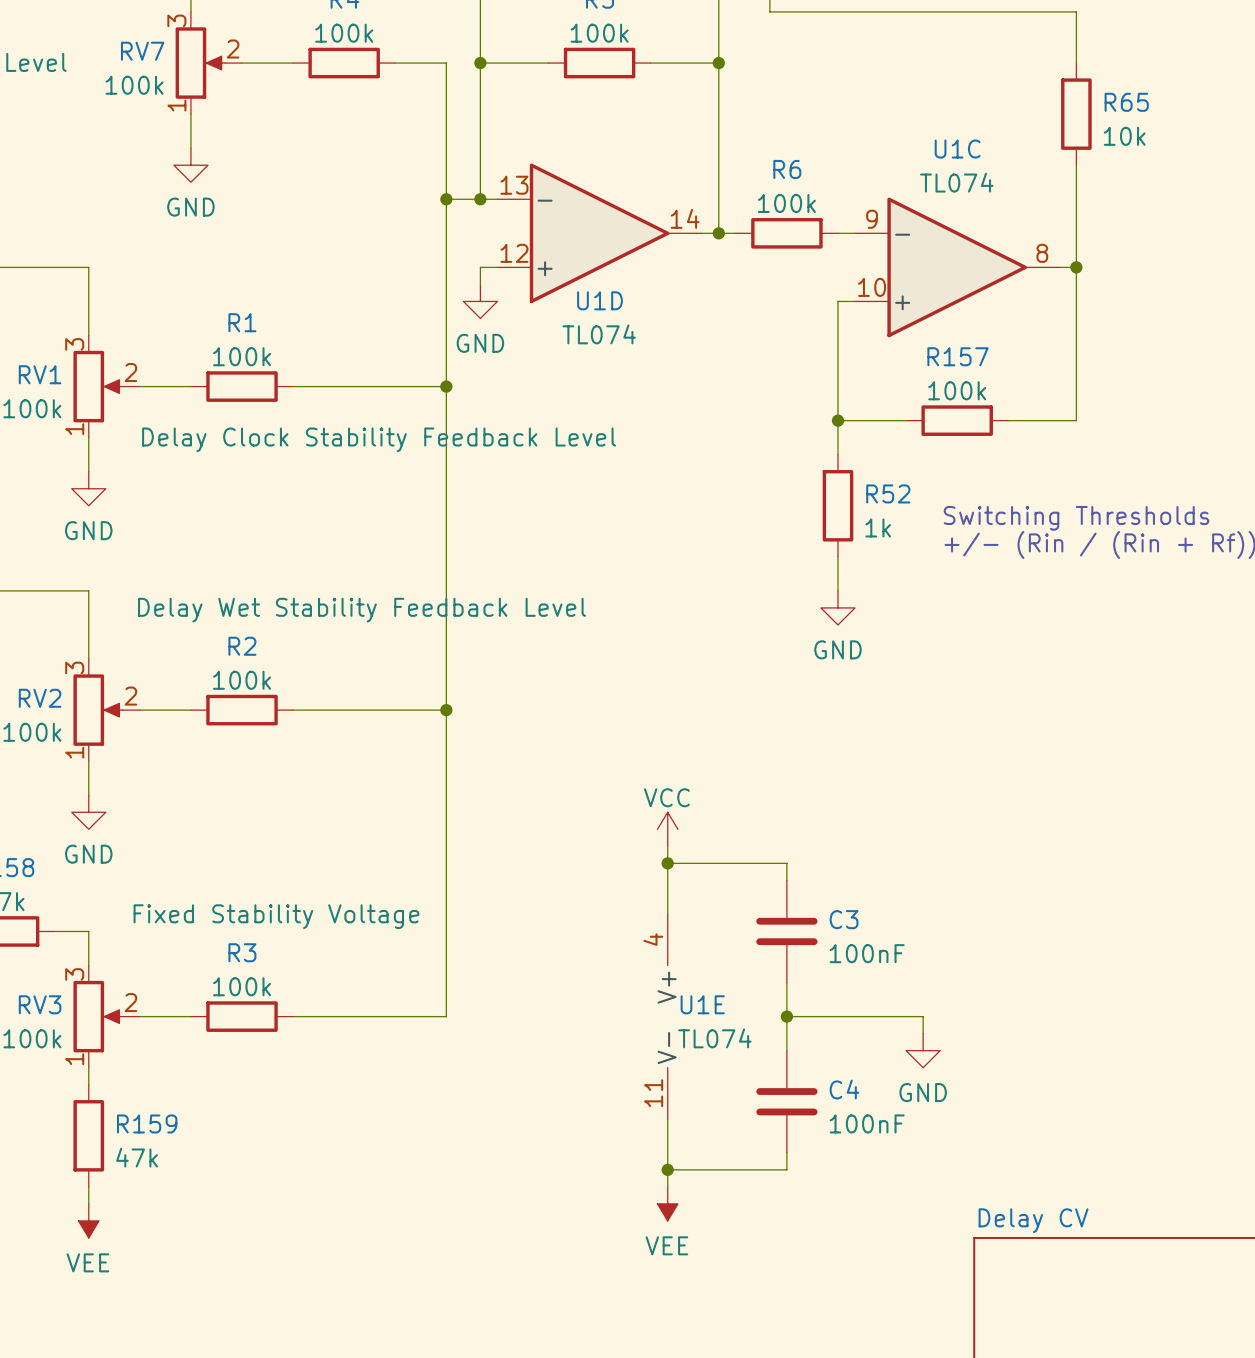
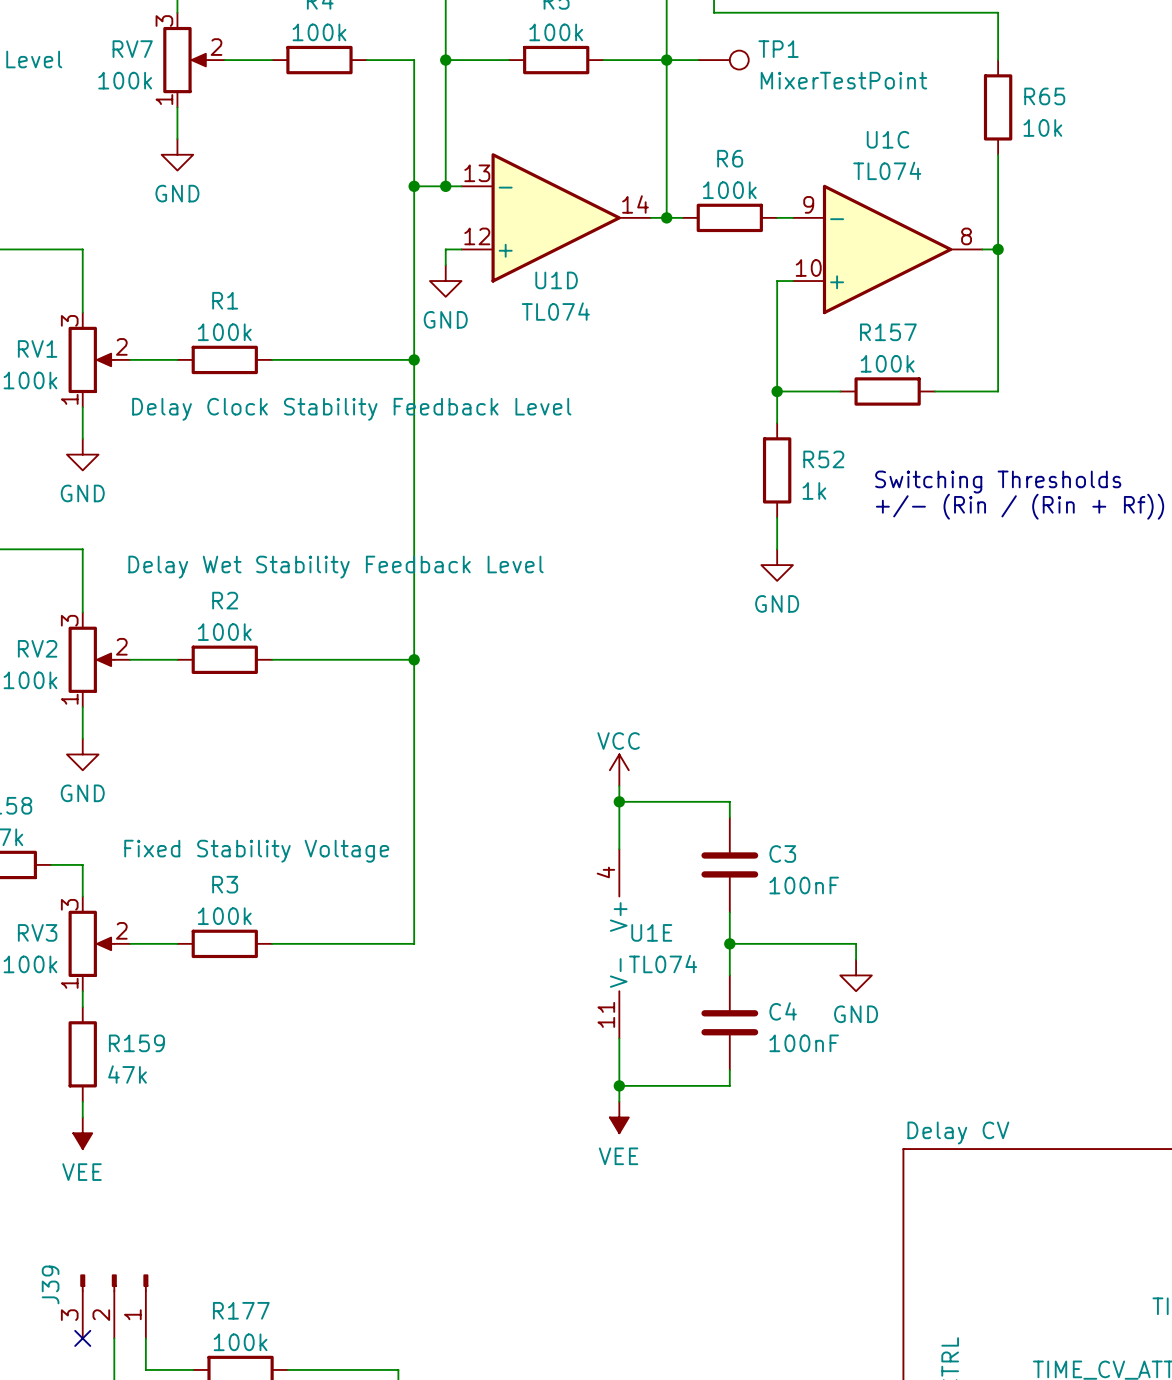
wire: none -> (666, 60) (698, 60)
TP1: none -> MixerTestPoint (723, 60)

